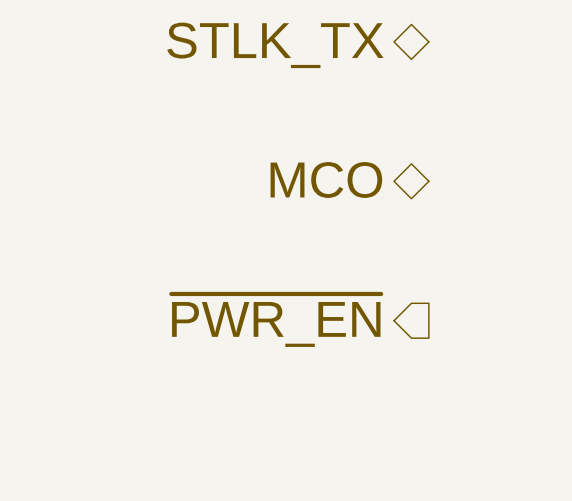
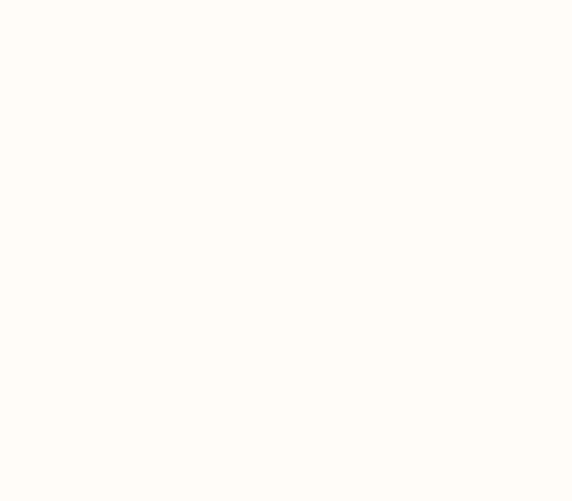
hierarchical label: STLK_TX (275, 45) -> none
hierarchical label: MCO (326, 180) -> none
hierarchical label: ~{PWR_EN} (276, 320) -> none

